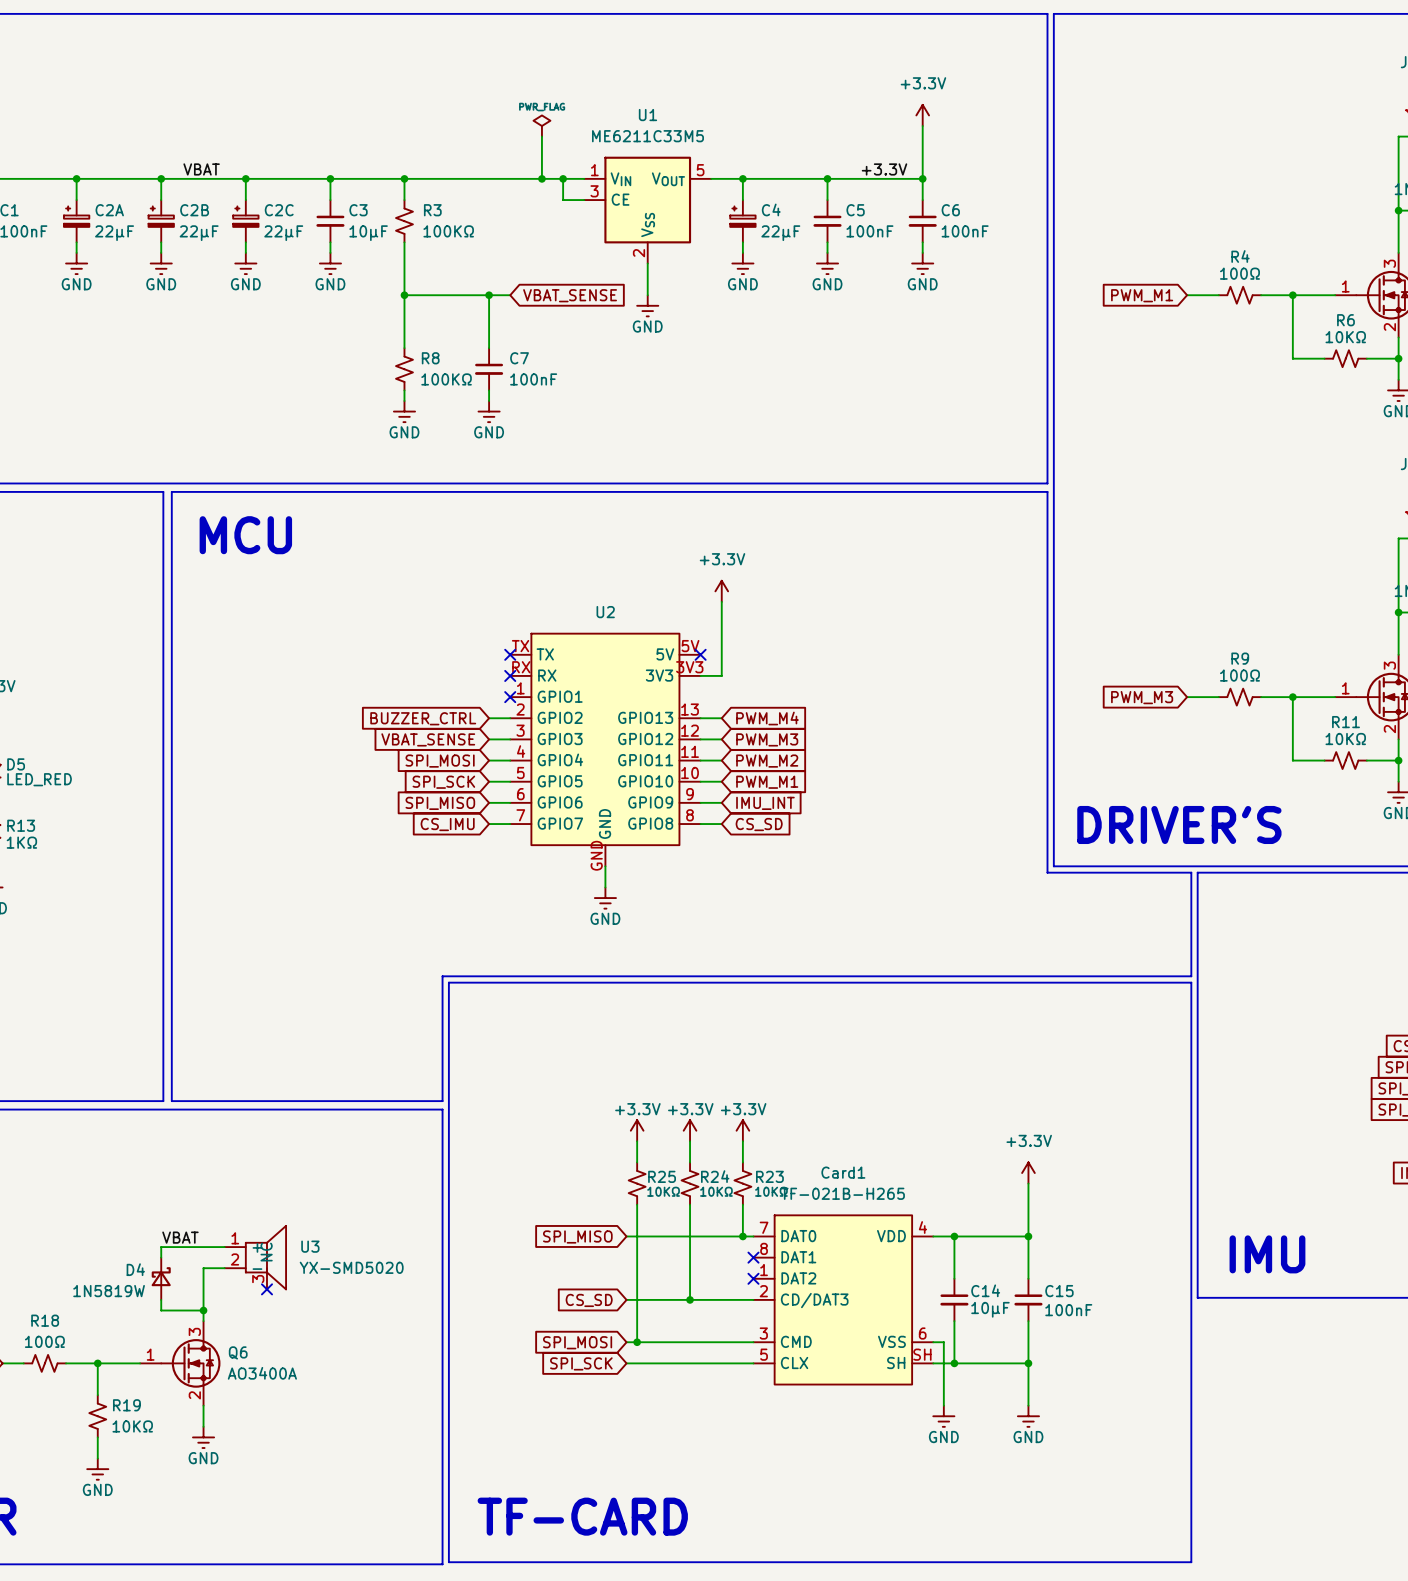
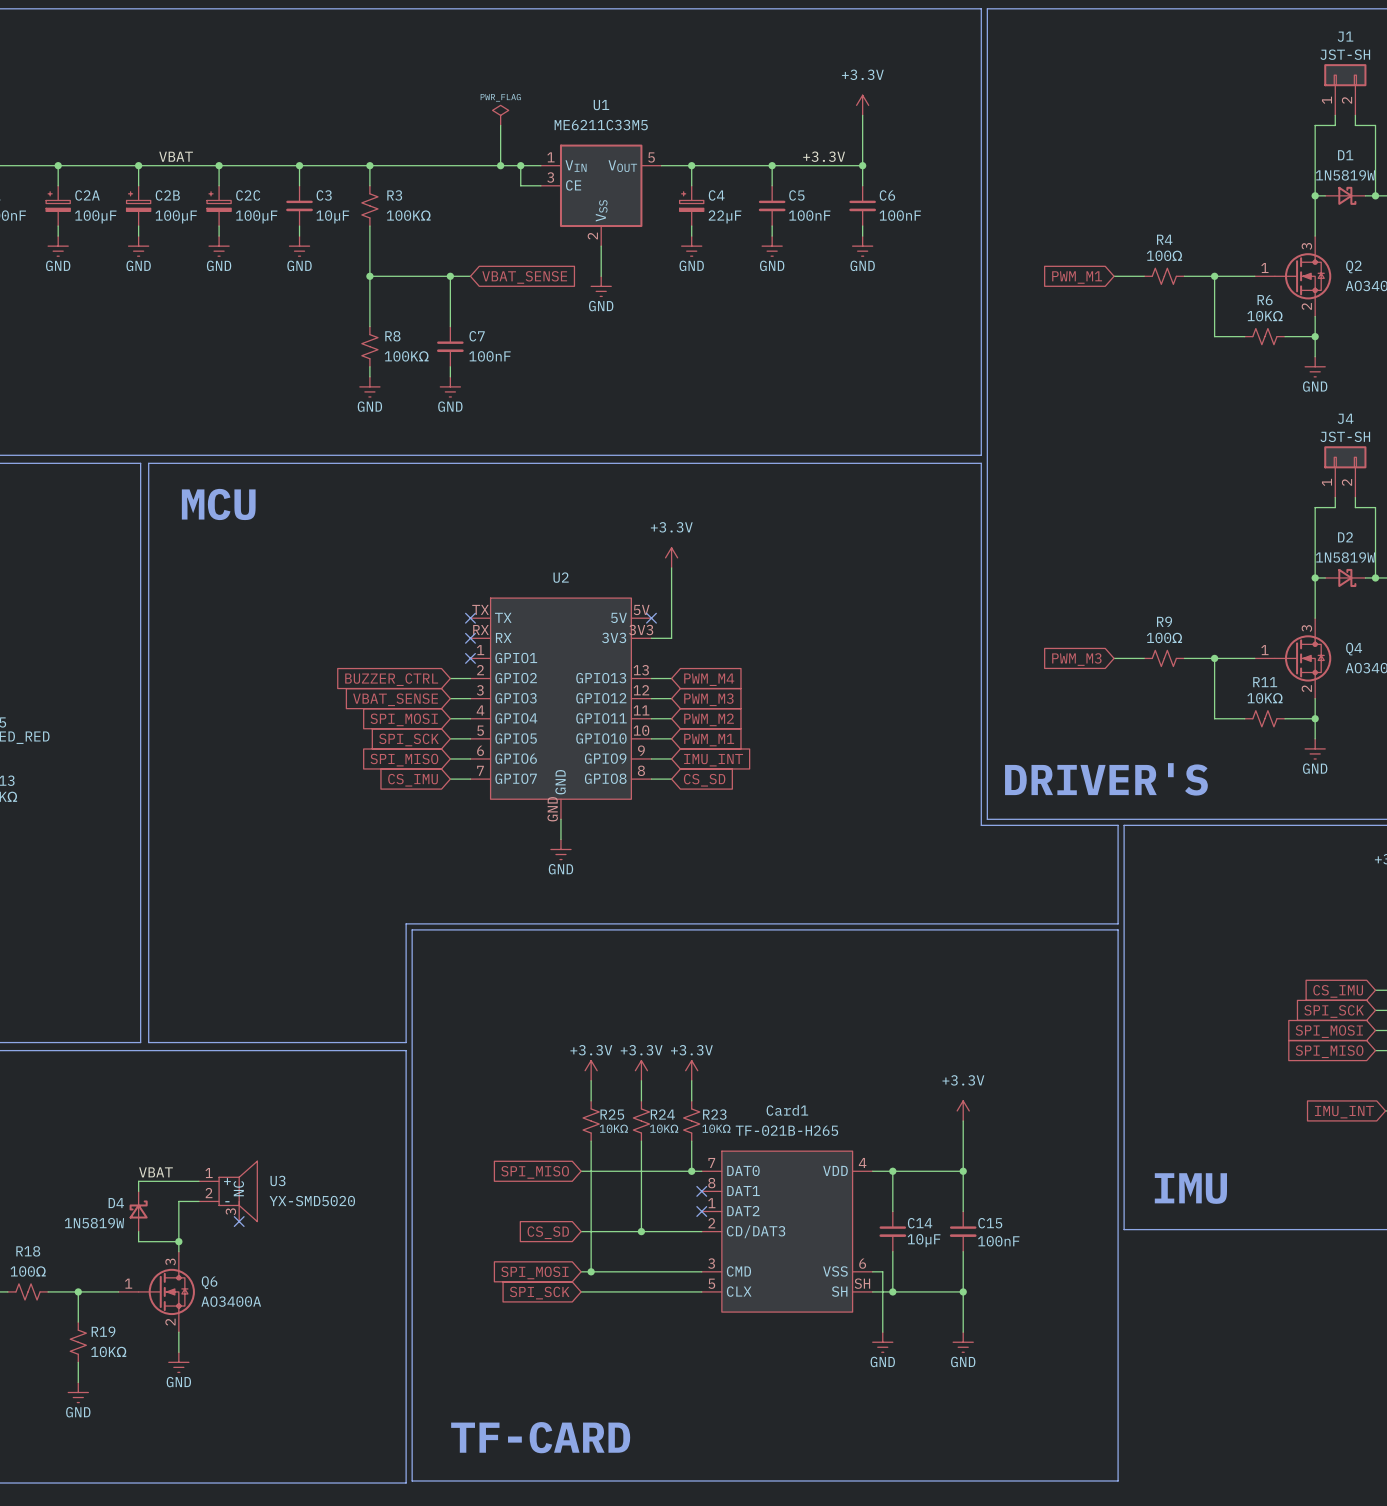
C2A value: 22µF (114, 233) -> 100µF (95, 216)
C2B value: 22µF (199, 233) -> 100µF (176, 216)
C2C value: 22µF (283, 233) -> 100µF (256, 216)

